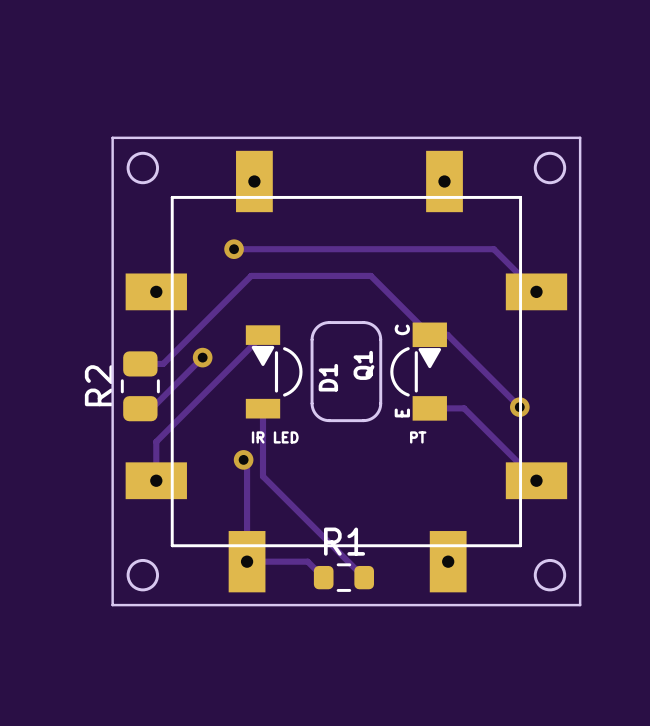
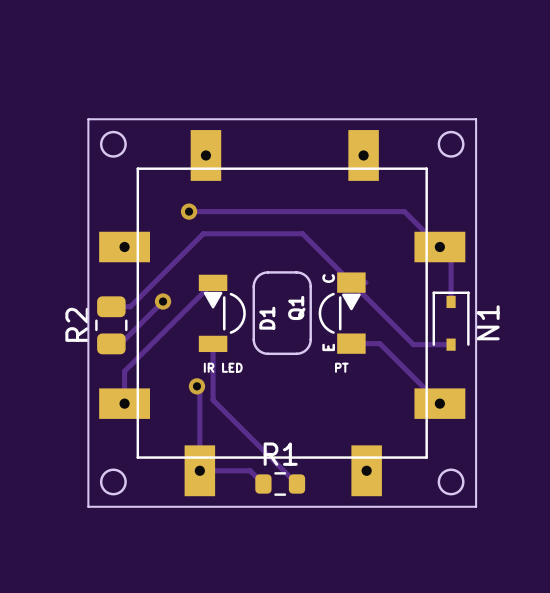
track: none -> (439, 247) (451, 258) (451, 301)
track: none -> (351, 282) (413, 344) (451, 344)
track: (447, 334) (519, 407) -> none
N1: none -> (451, 321)
via: (519, 407) -> none

